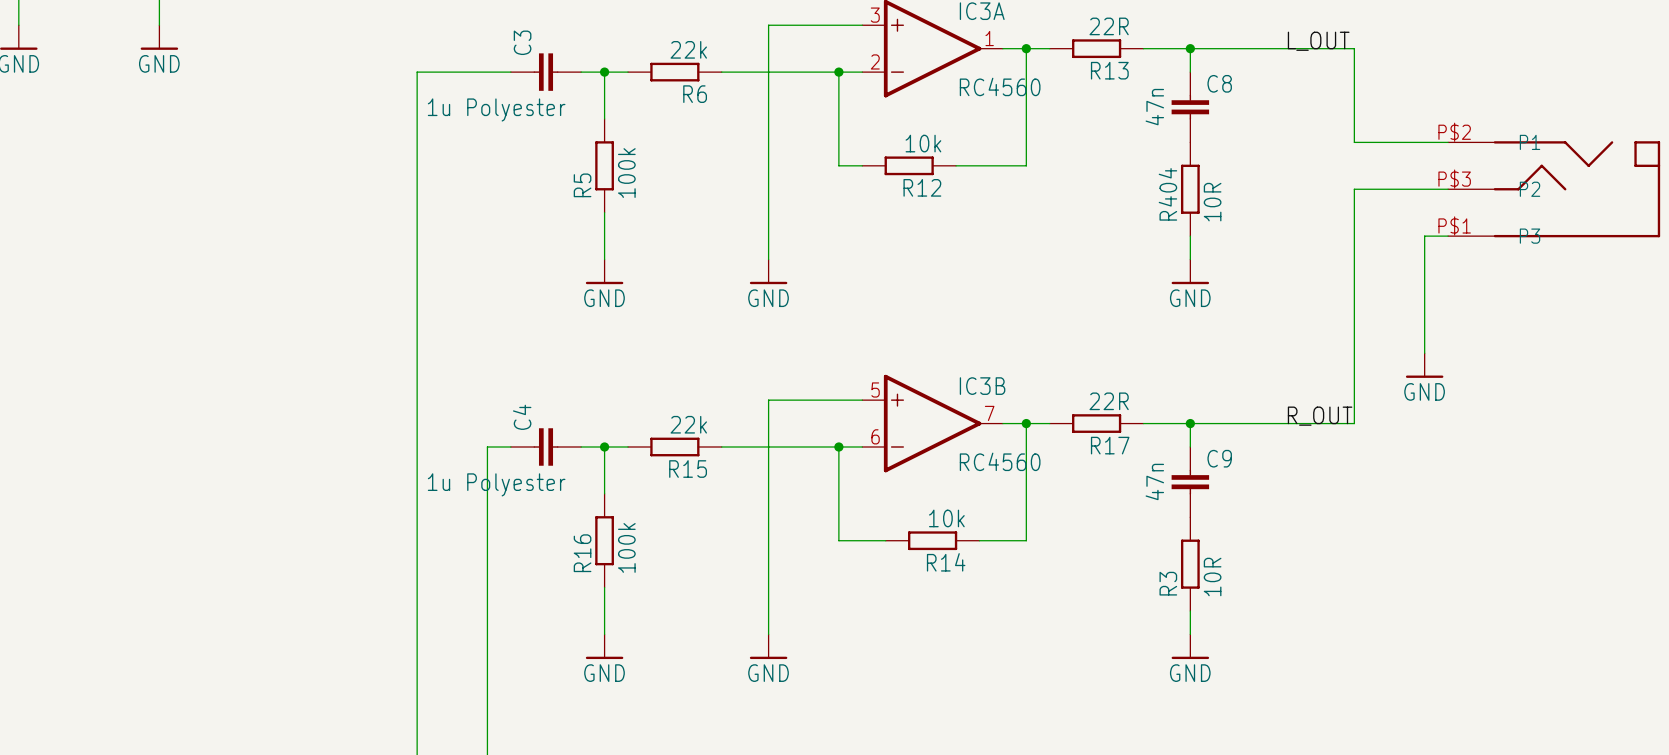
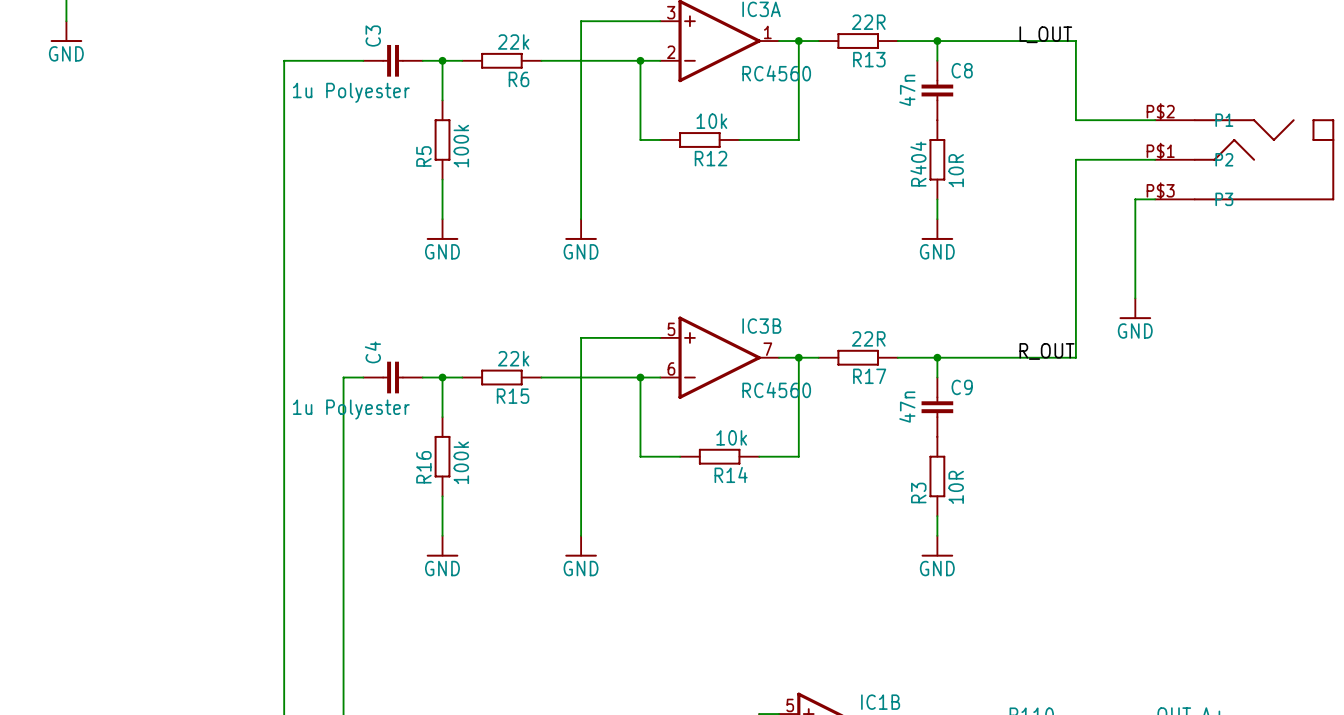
part pin number: P$3 (1454, 179) -> P$1 (1160, 151)
part pin number: P$1 (1454, 225) -> P$3 (1160, 190)

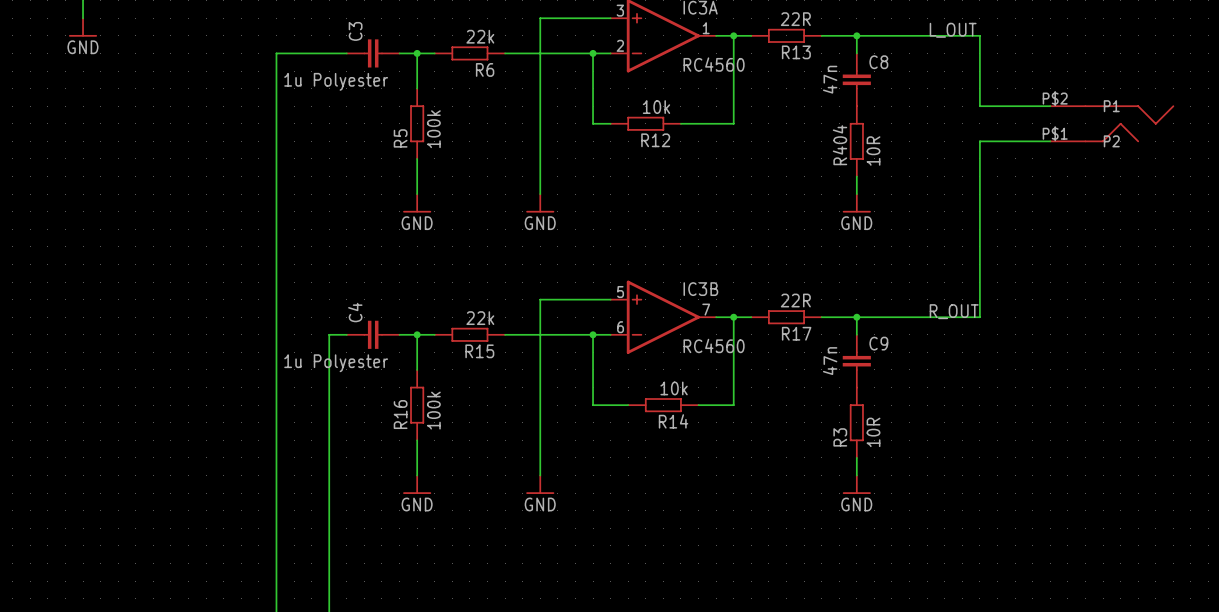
part: (1244, 159) -> none
wire: (1155, 199) (1135, 199) (1135, 298) -> none
power symbol: GND (1135, 308) -> none

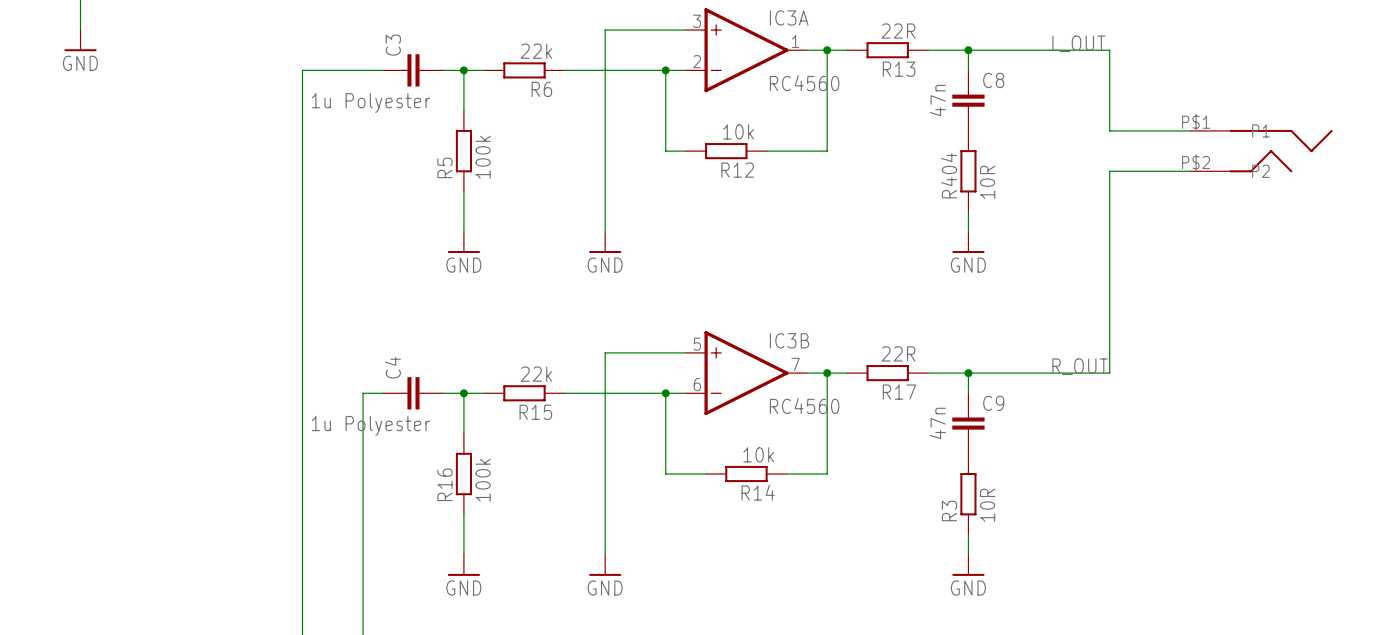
part pin number: P$2 (1055, 98) -> P$1 (1196, 122)
part pin number: P$1 (1055, 133) -> P$2 (1196, 162)

